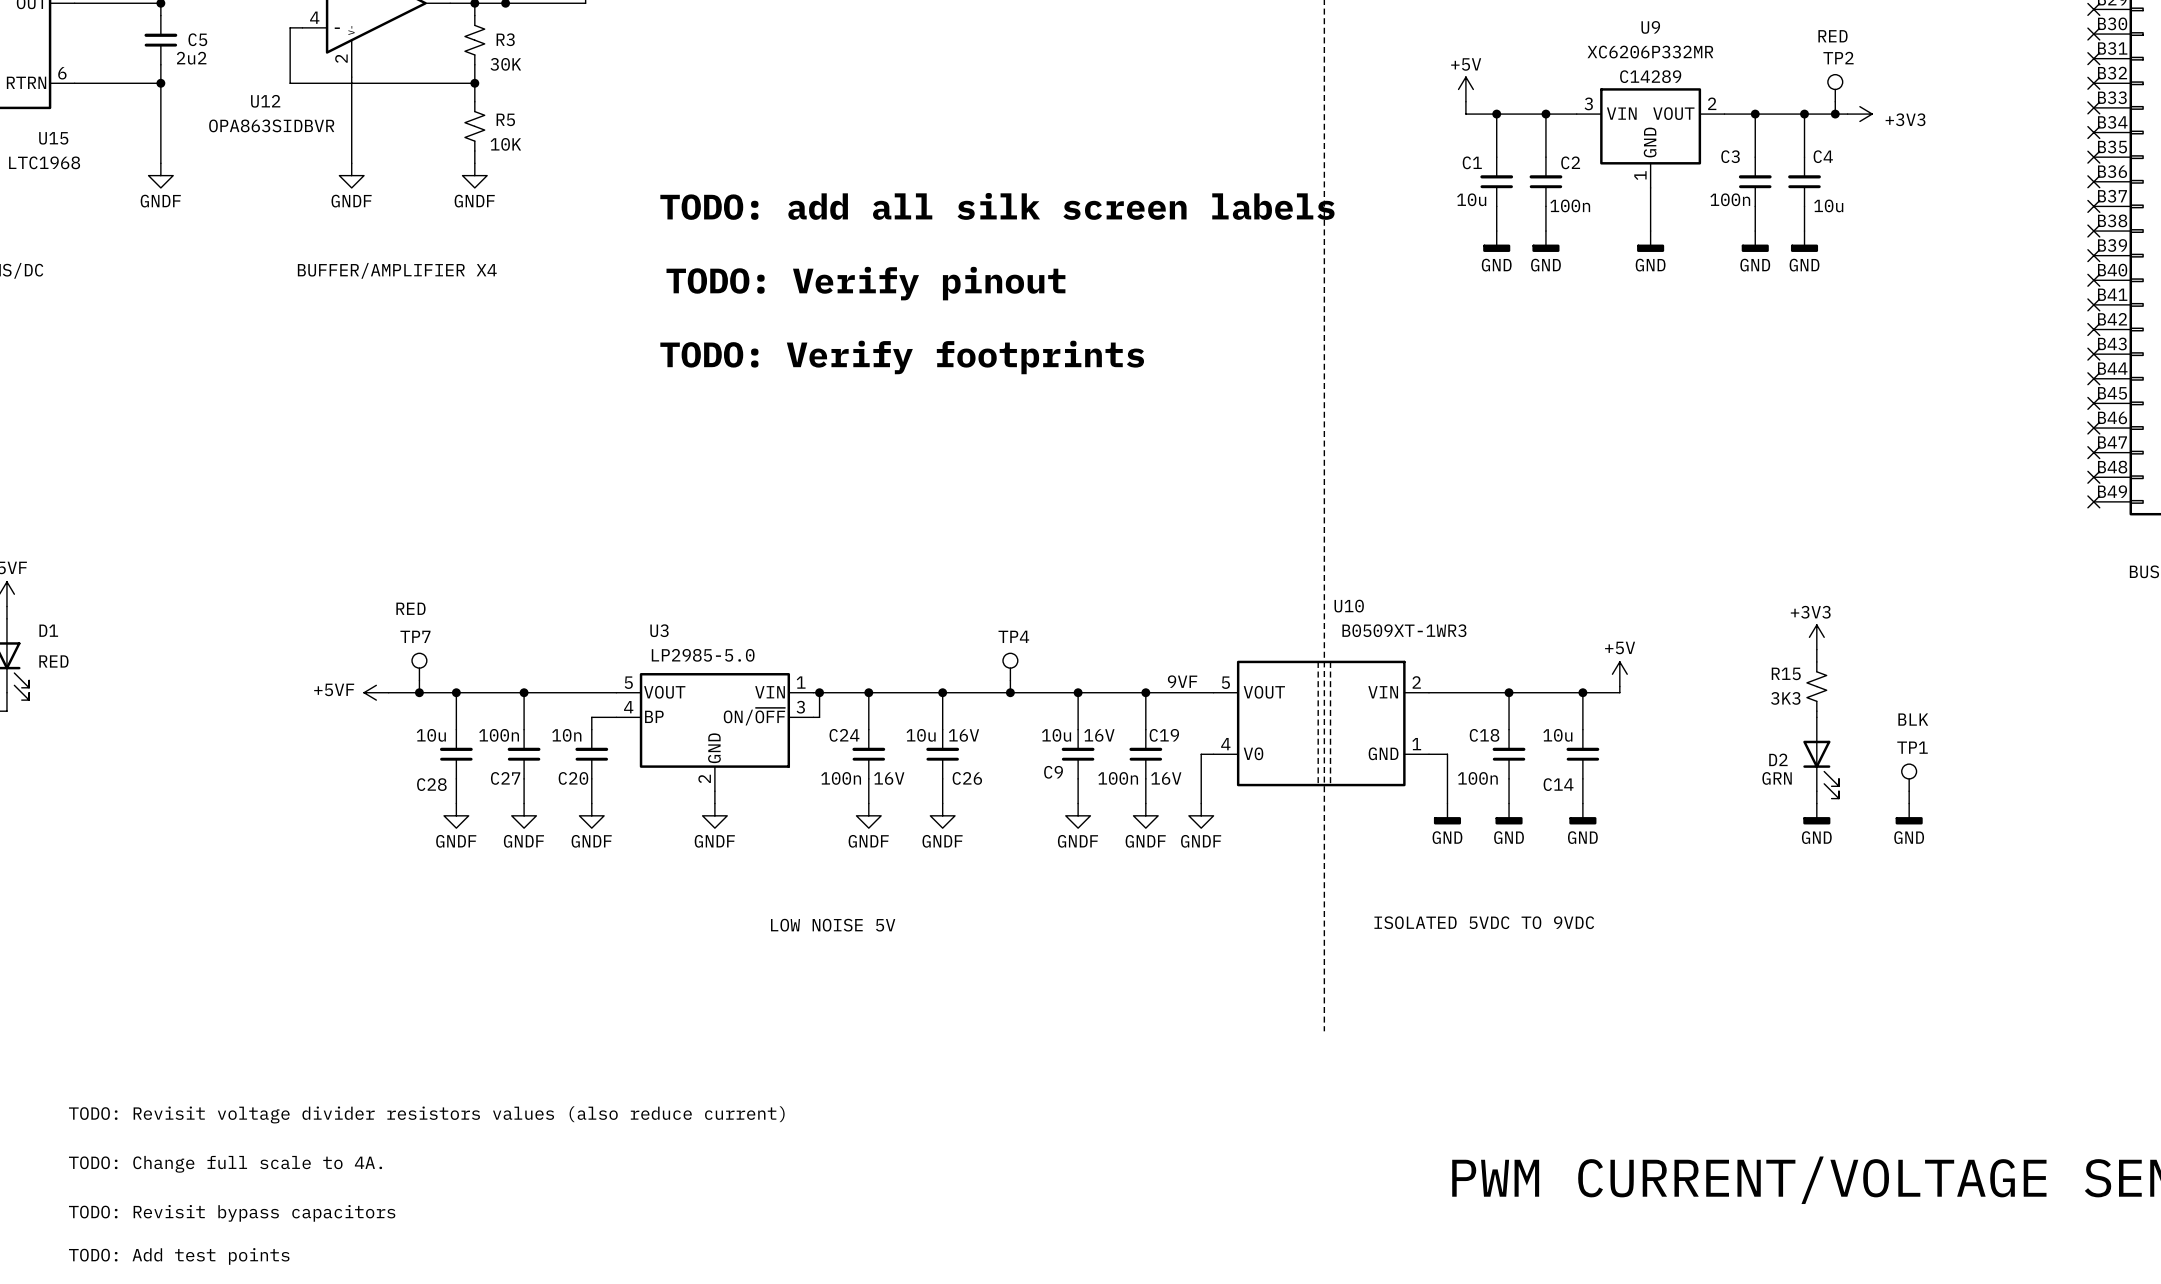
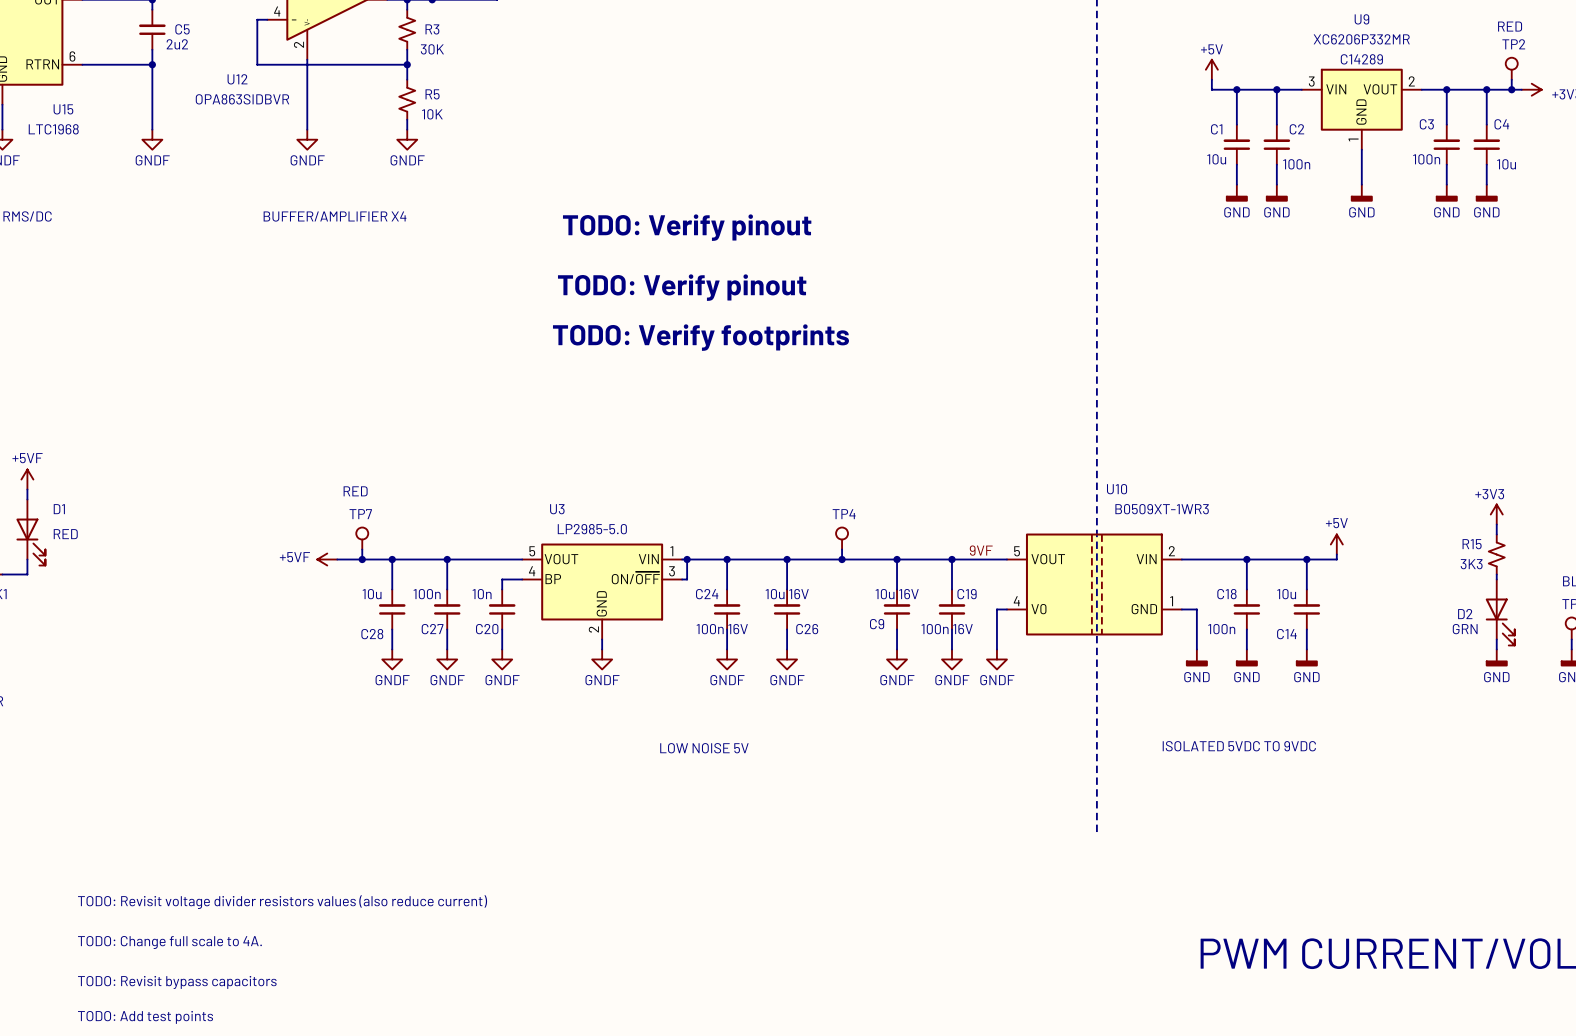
text: TODO: add all silk screen labels (997, 206) -> none
text: TODO: Verify footprints (902, 357) -> TODO: Verify pinout (682, 287)
text: none -> TODO: Verify footprints (700, 337)

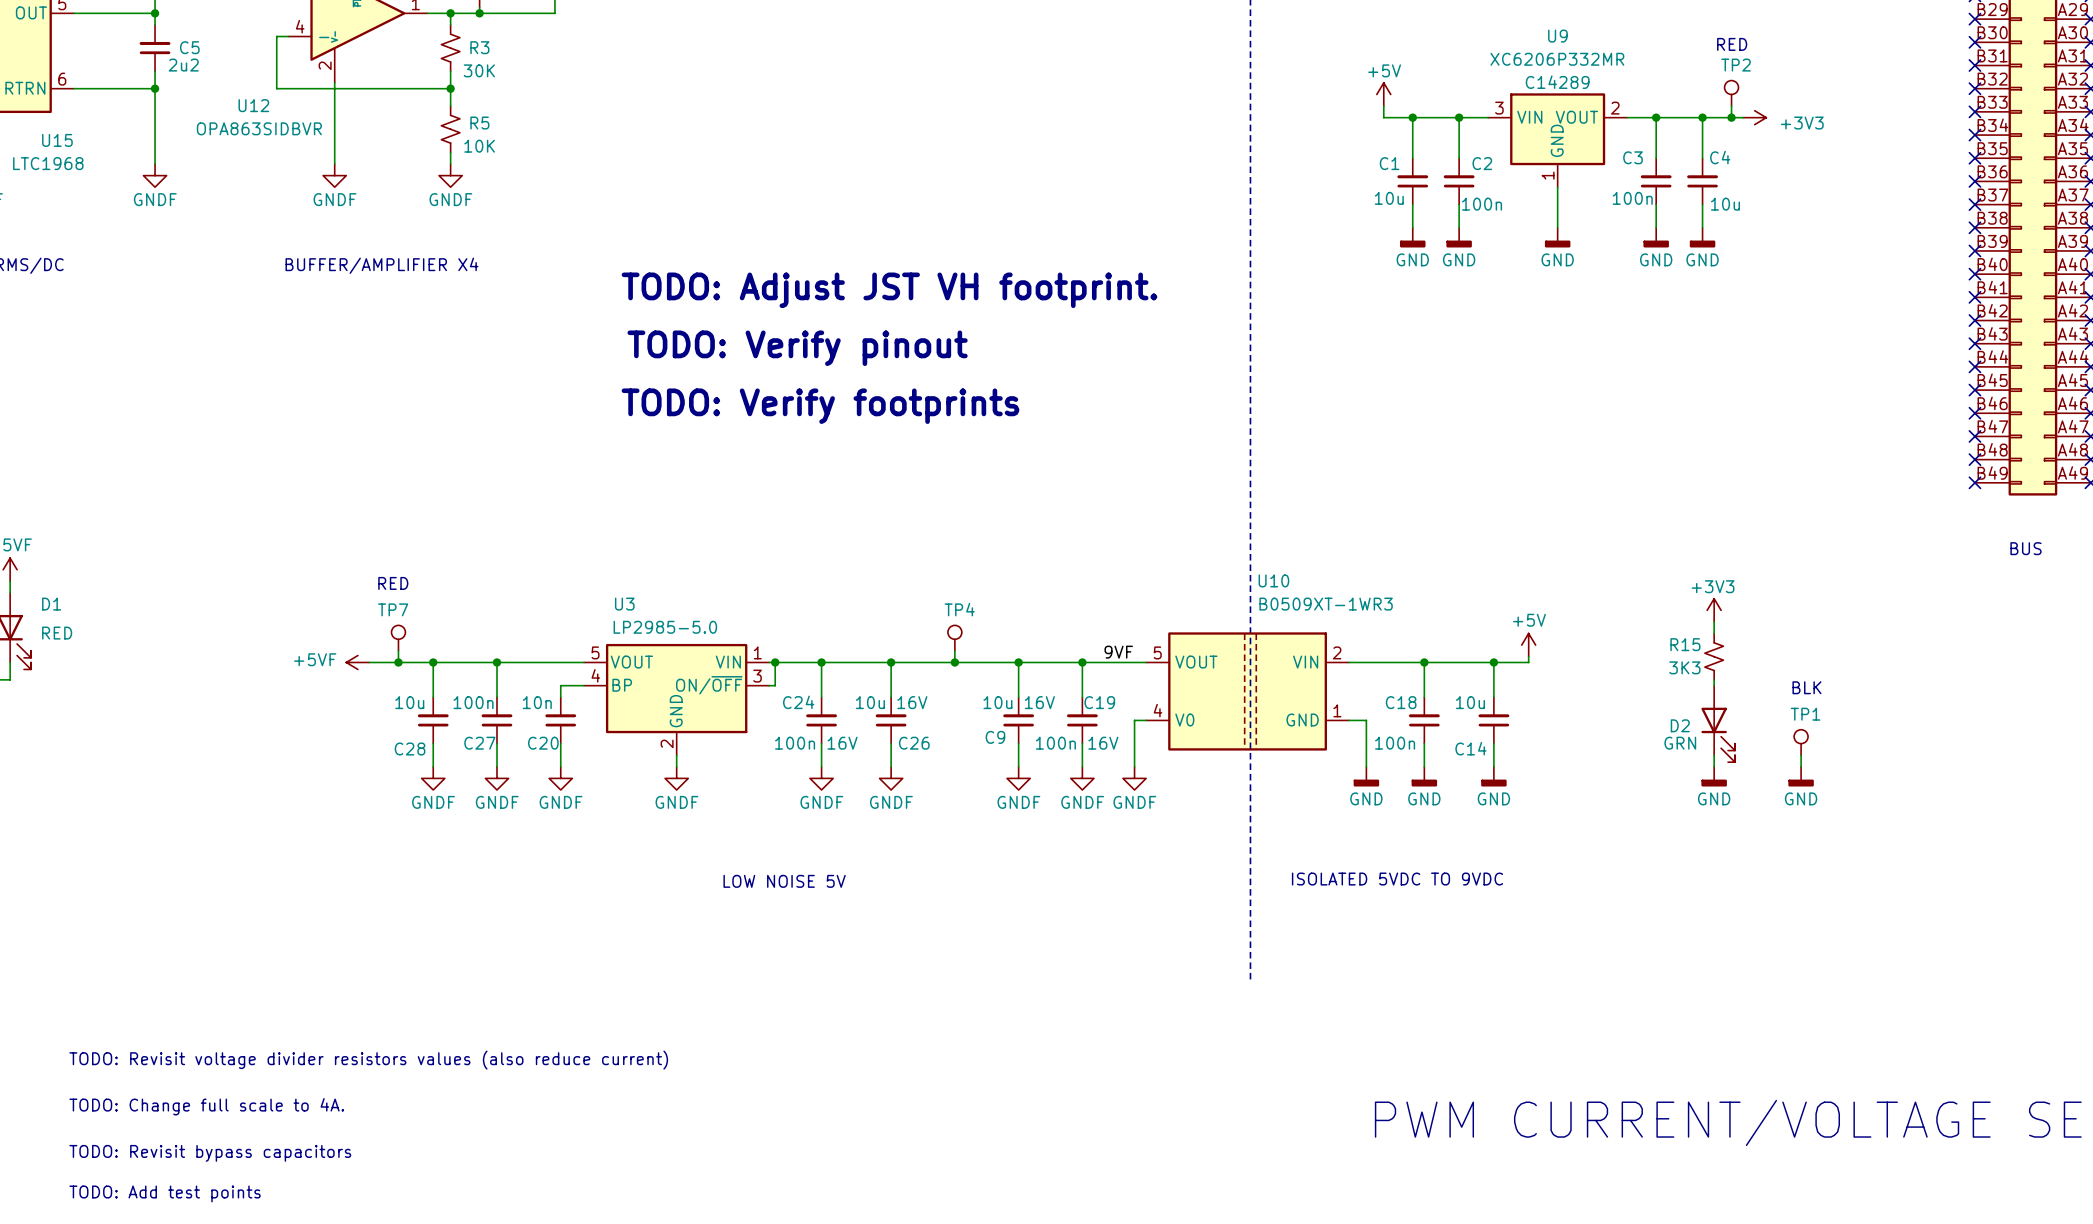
text: TODO: Verify pinout (687, 227) -> none
text: none -> TODO: Adjust JST VH footprint. (889, 290)

